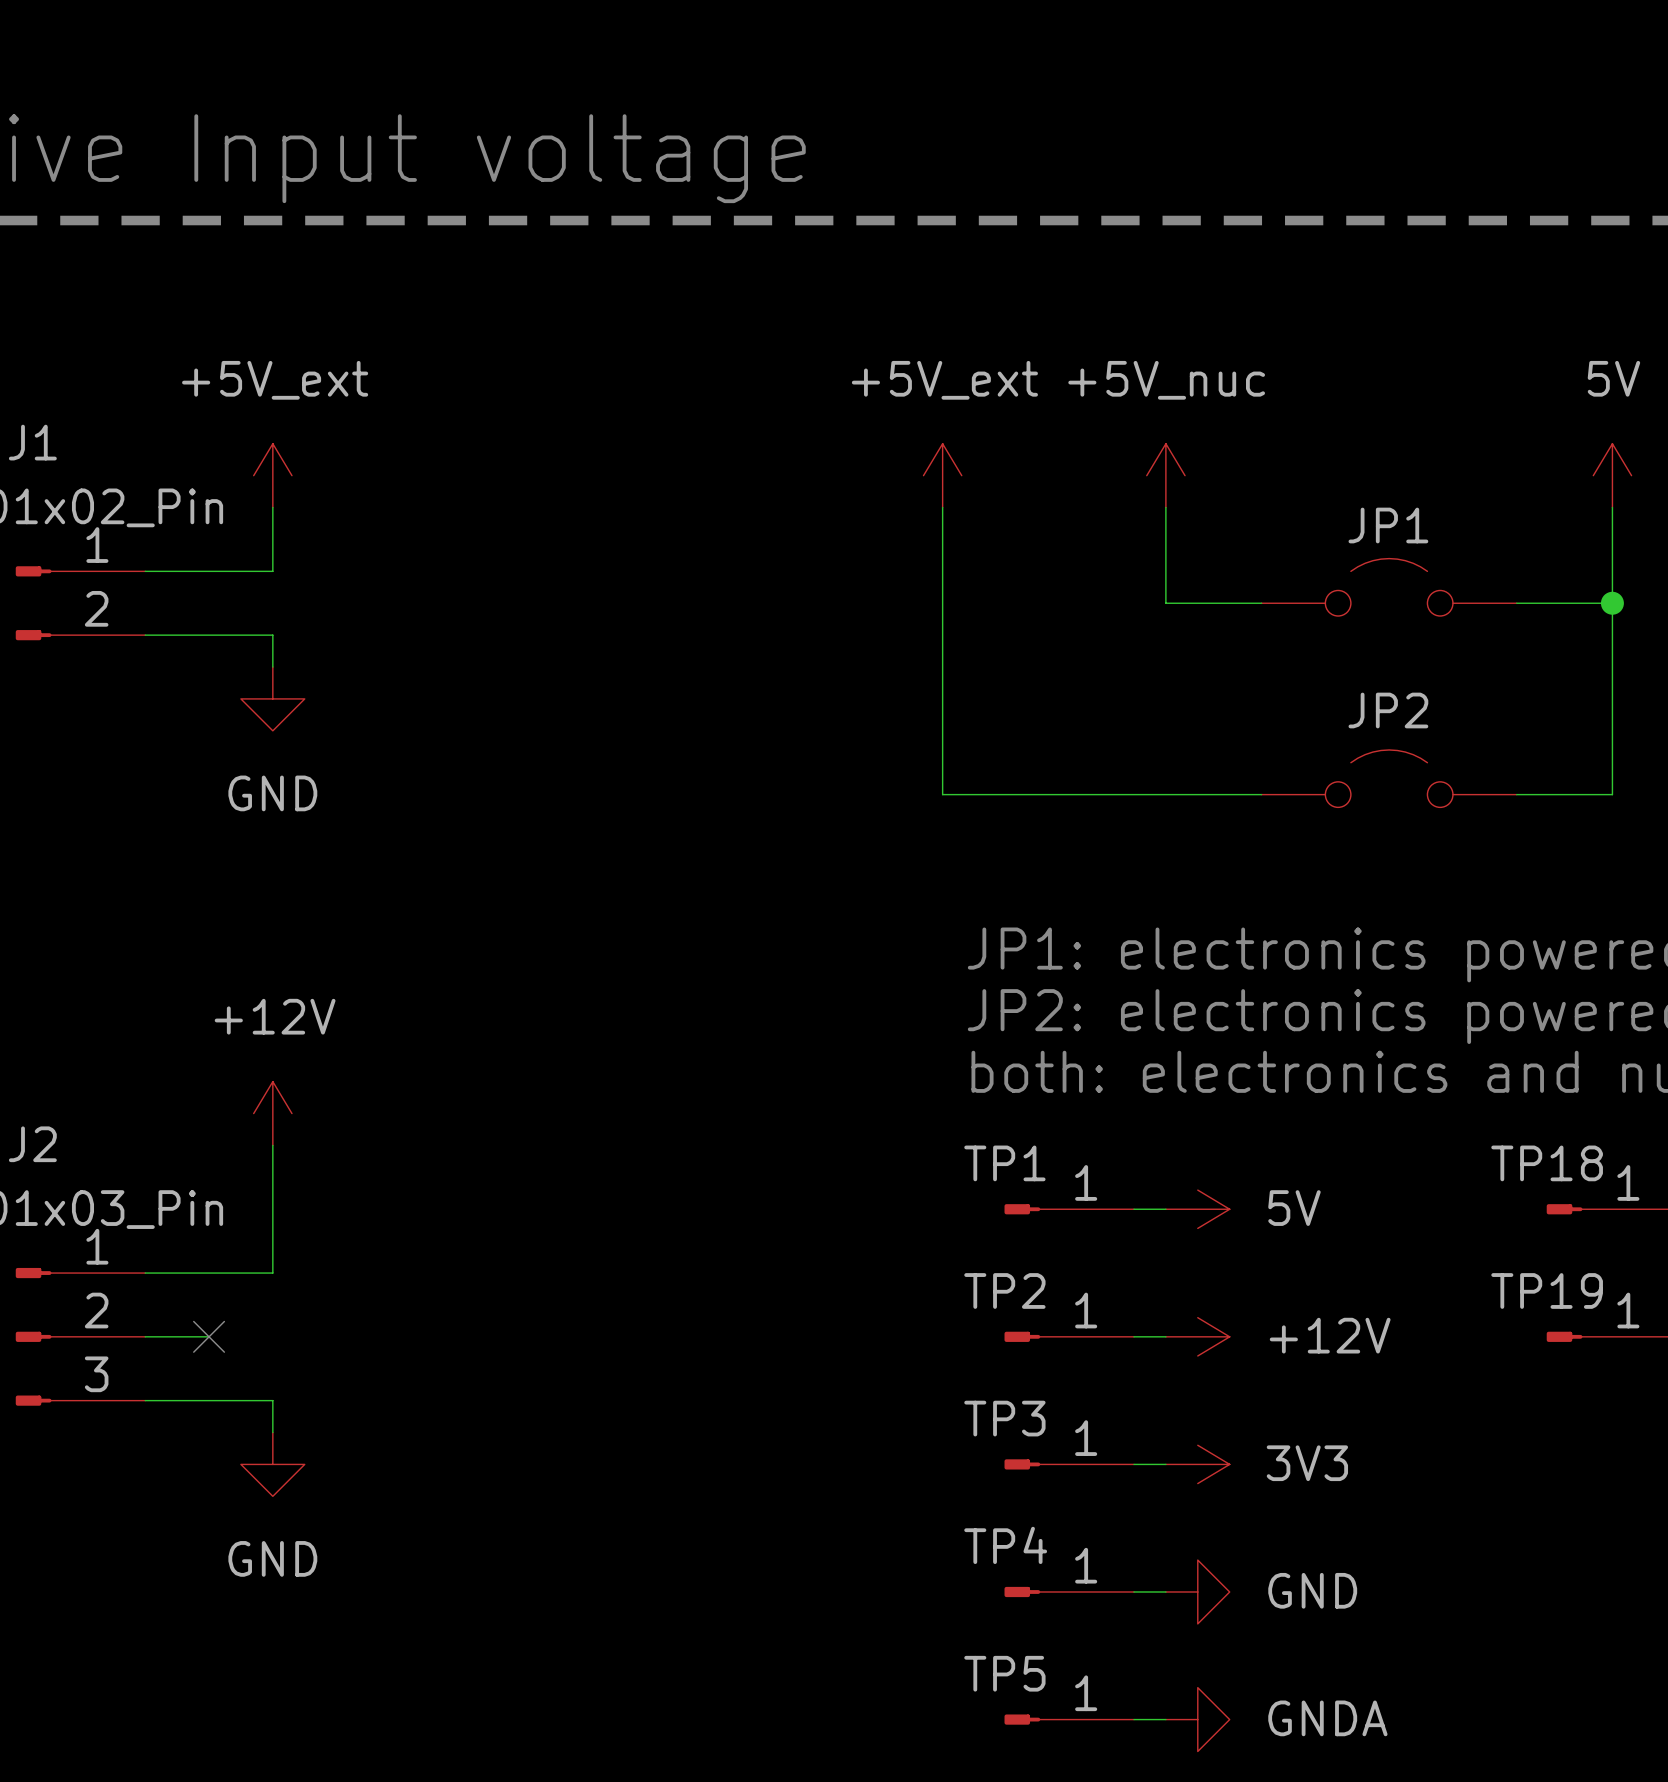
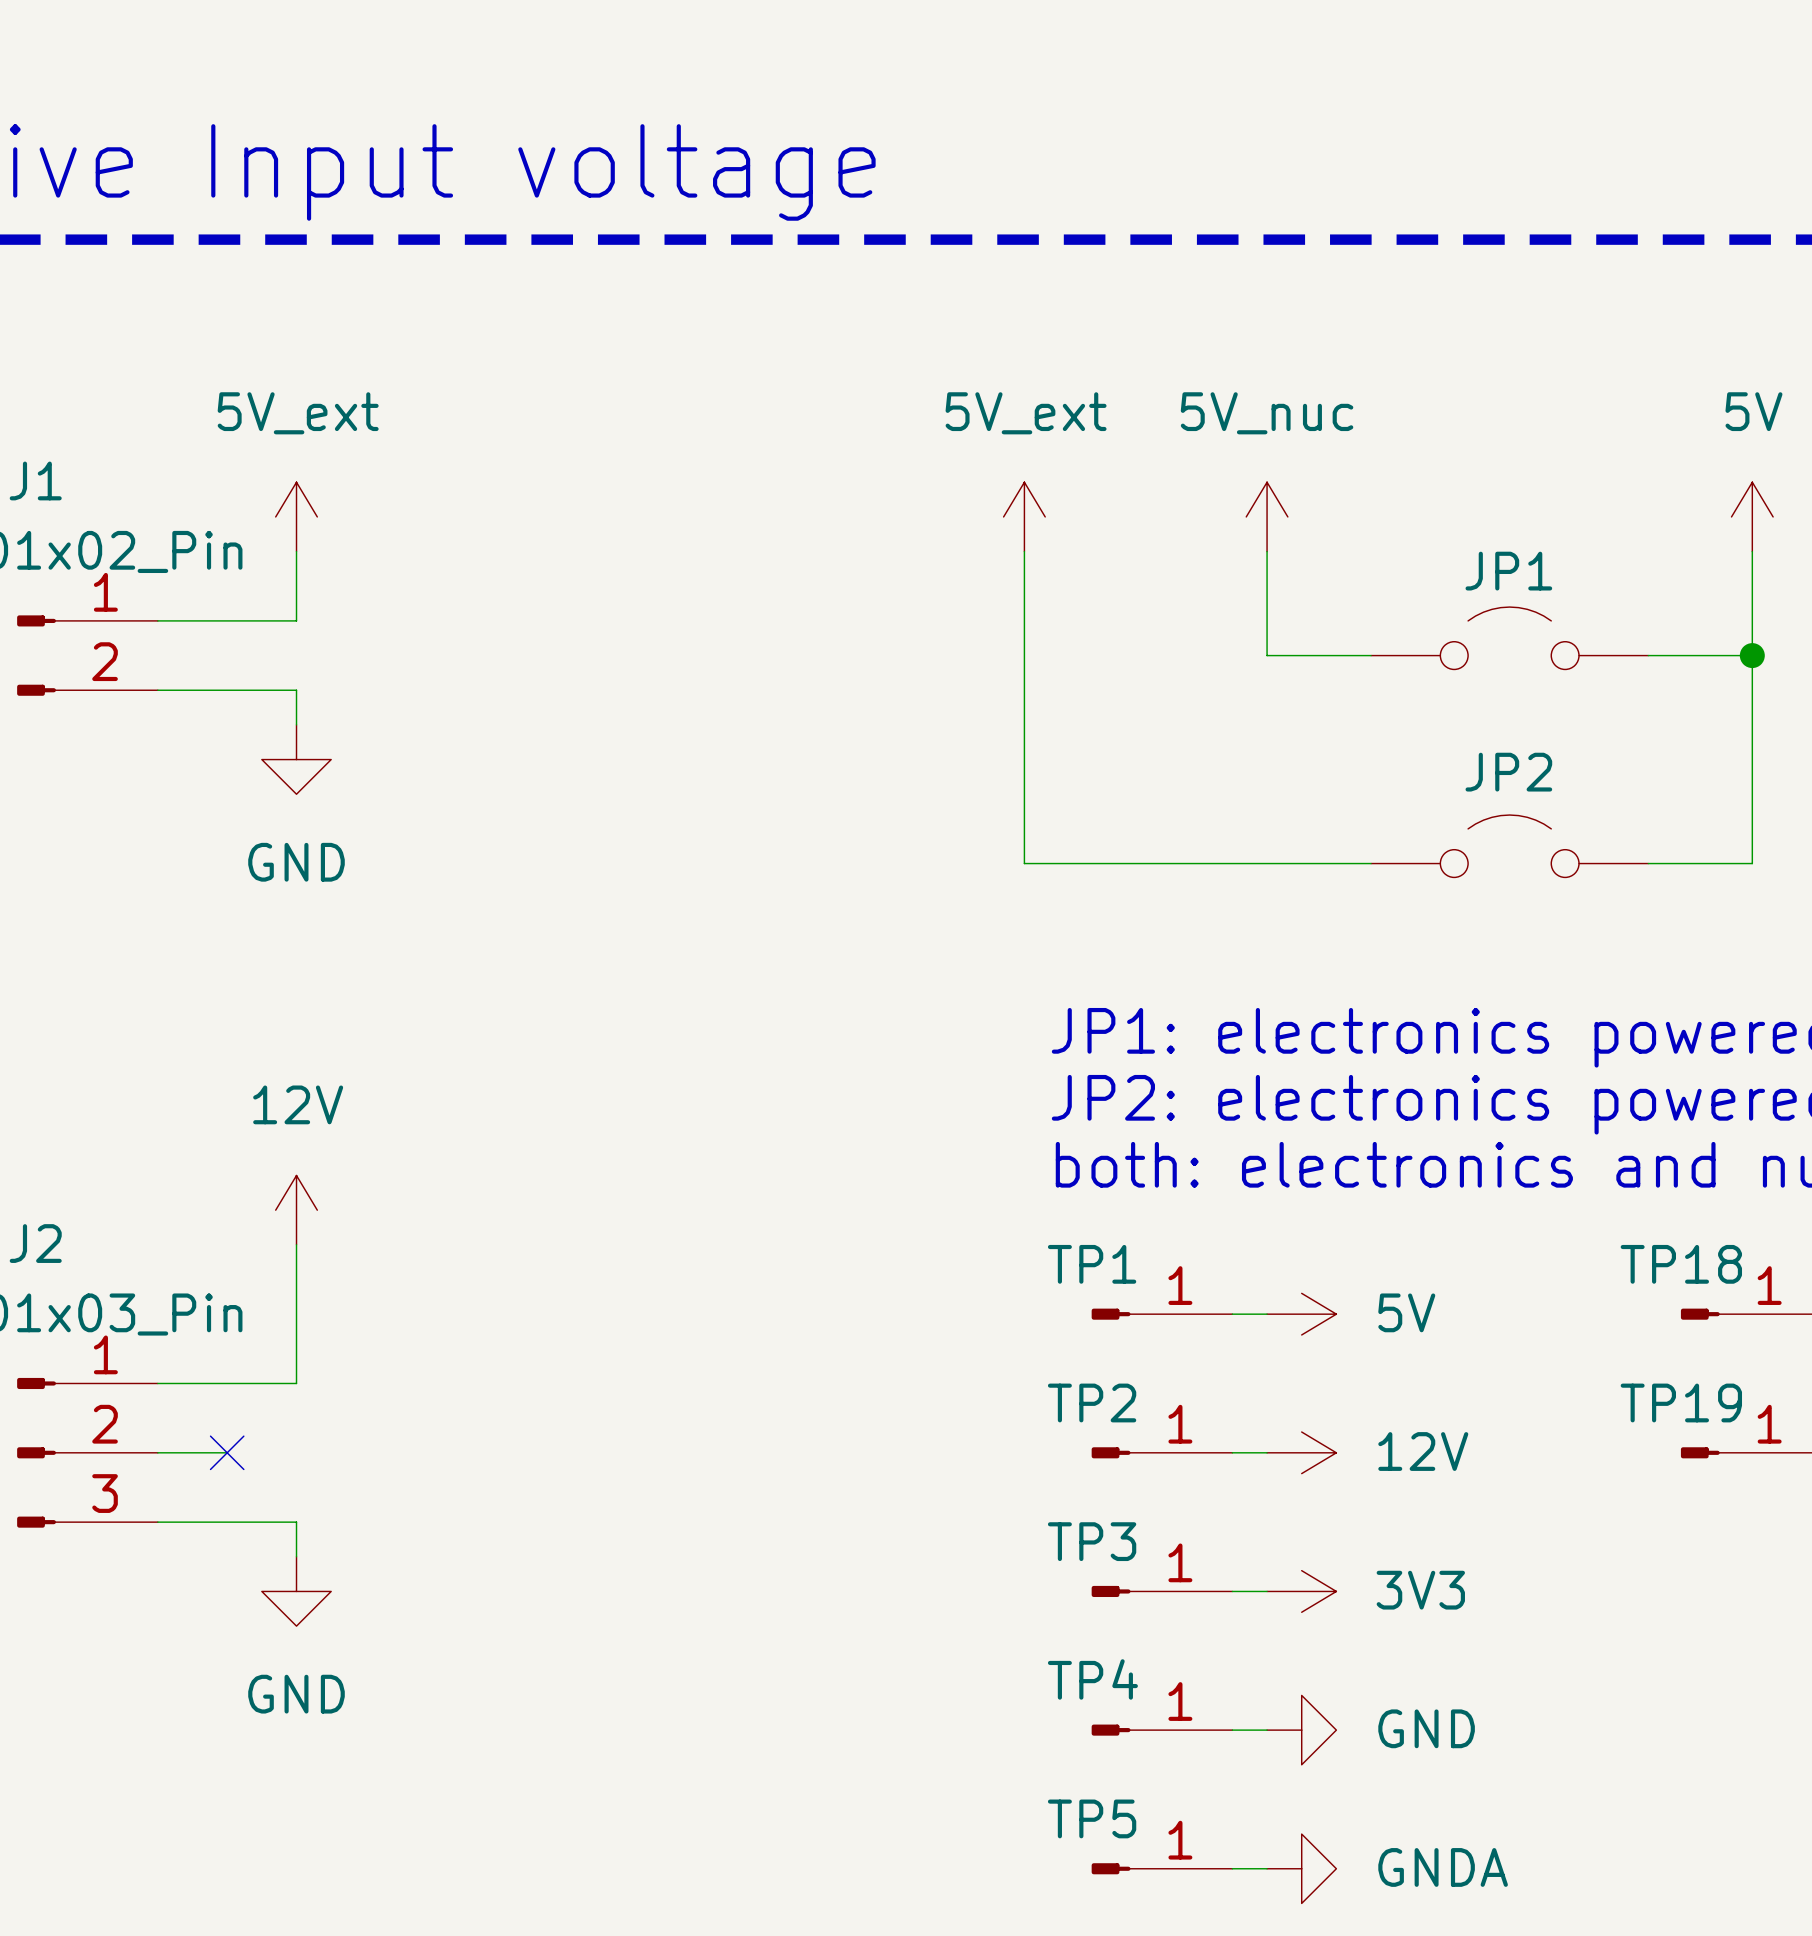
power symbol: +5V_ext (272, 475) -> 5V_ext (296, 516)
power symbol: +5V_ext (942, 475) -> 5V_ext (1024, 516)
power symbol: +5V_nuc (1165, 475) -> 5V_nuc (1267, 516)
power symbol: +12V (272, 1113) -> 12V (296, 1210)
power symbol: +12V (1197, 1336) -> 12V (1301, 1452)

